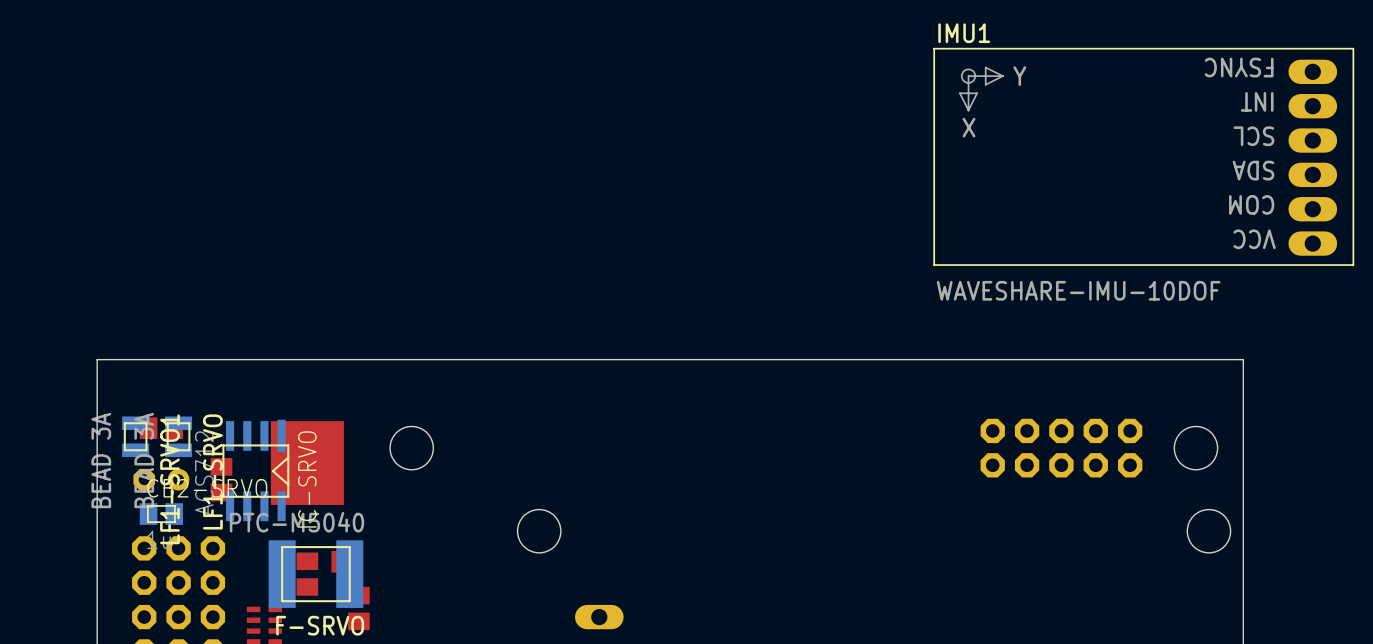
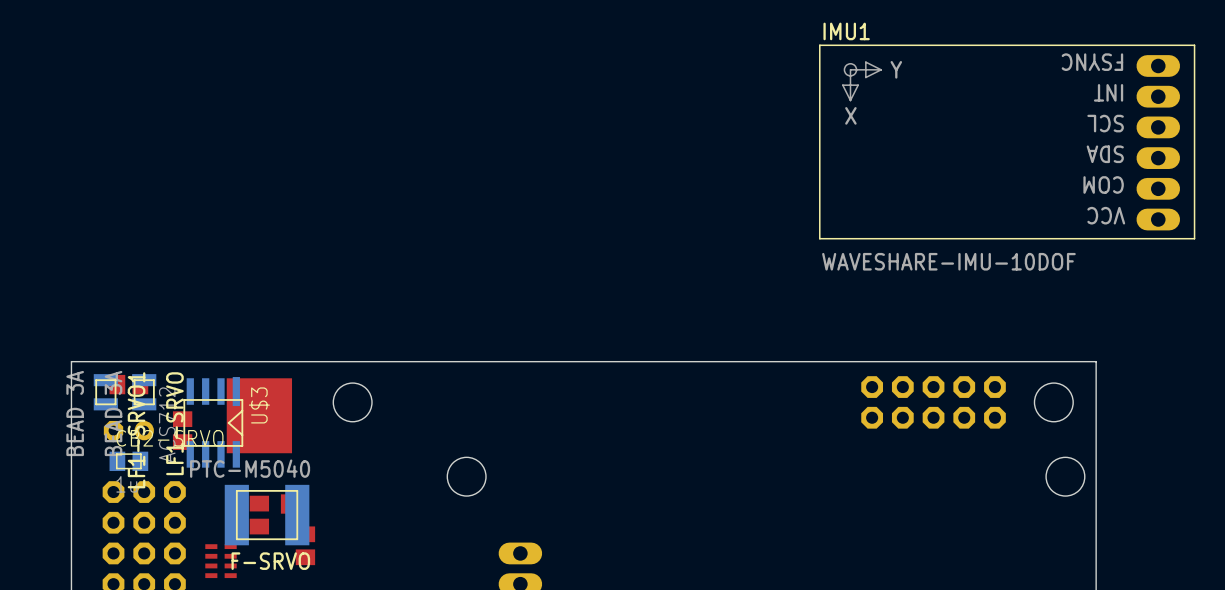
board edge: (1243, 402) (1243, 359) (97, 359) (97, 402) -> (1096, 361) (71, 361)
IC-SRVO name: IC-SRVO (307, 479) -> U$3 (259, 405)

